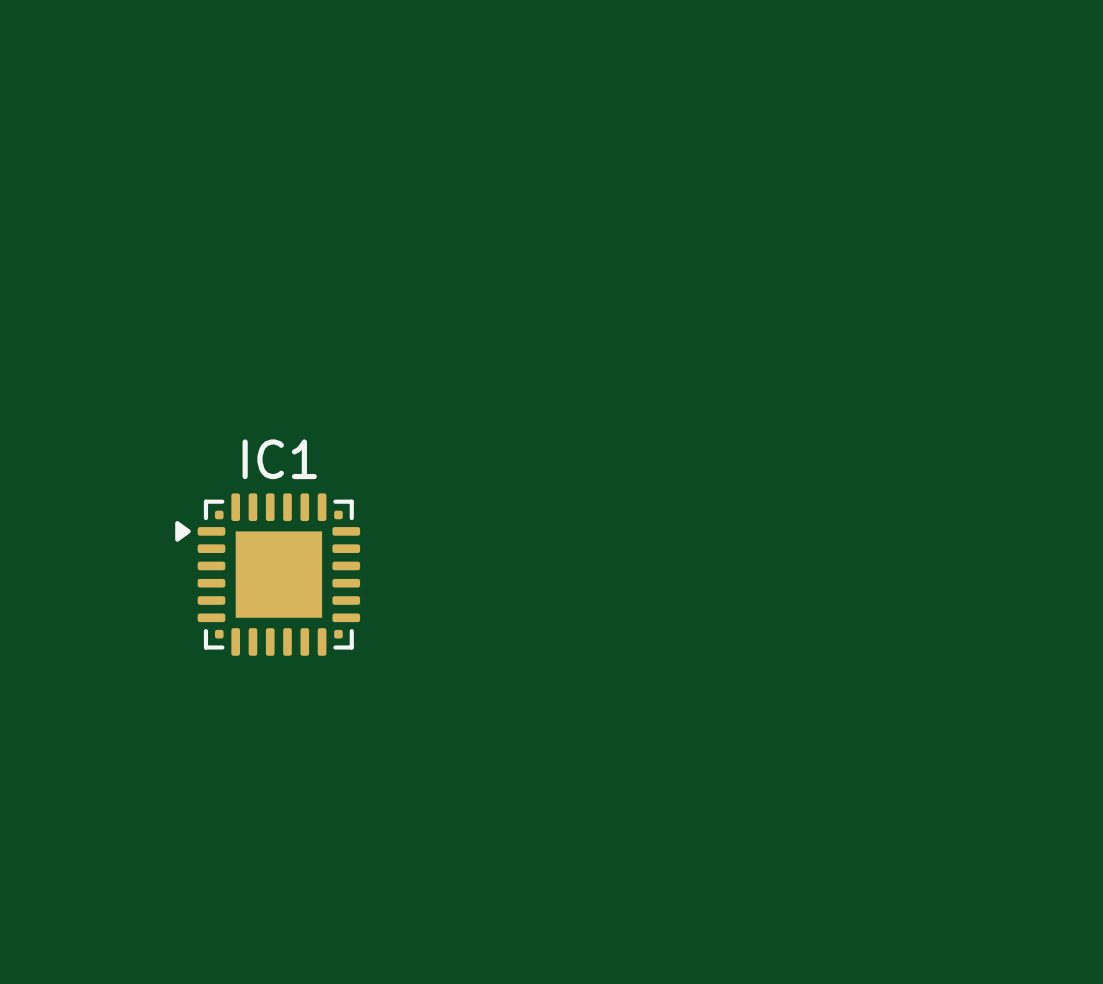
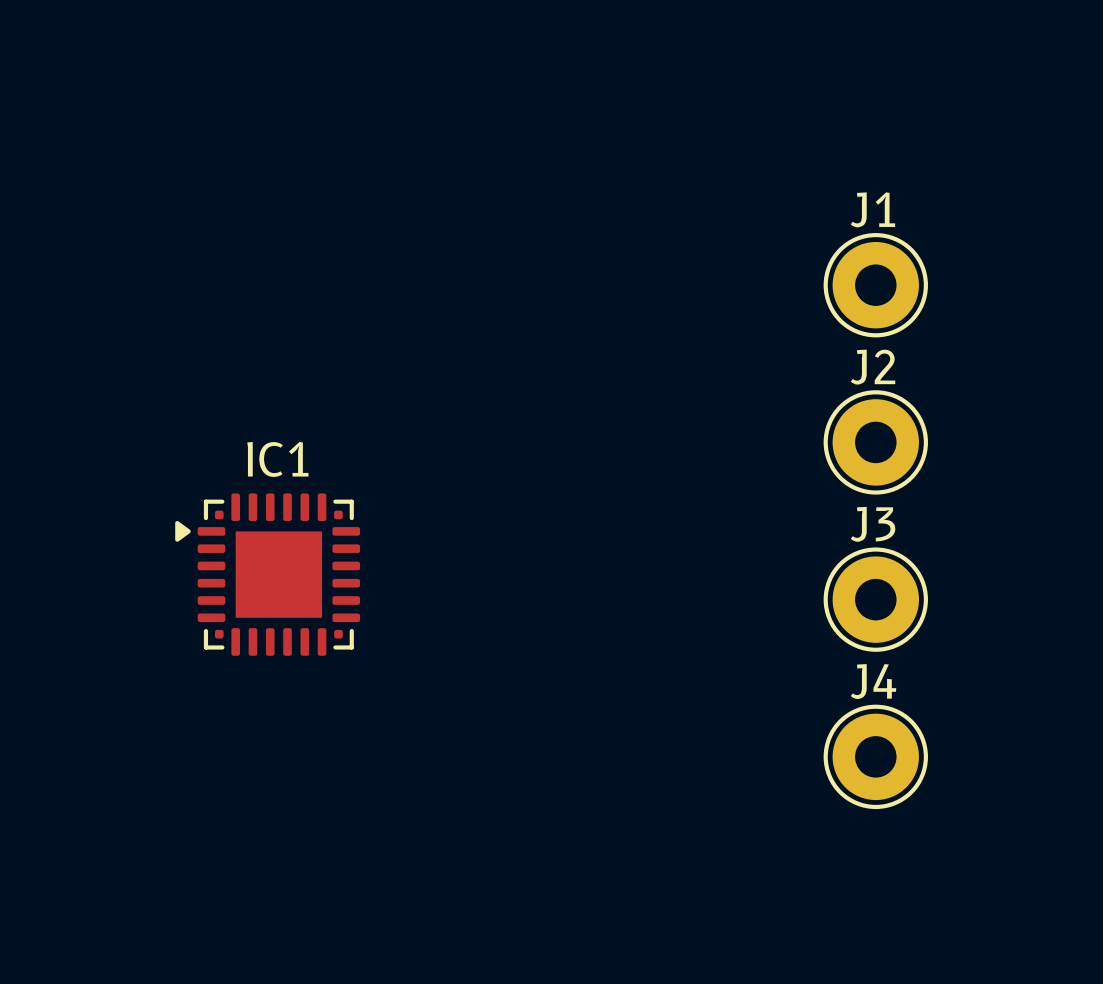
J1: none -> (875, 285)
J2: none -> (875, 442)
J3: none -> (875, 599)
J4: none -> (875, 756)

